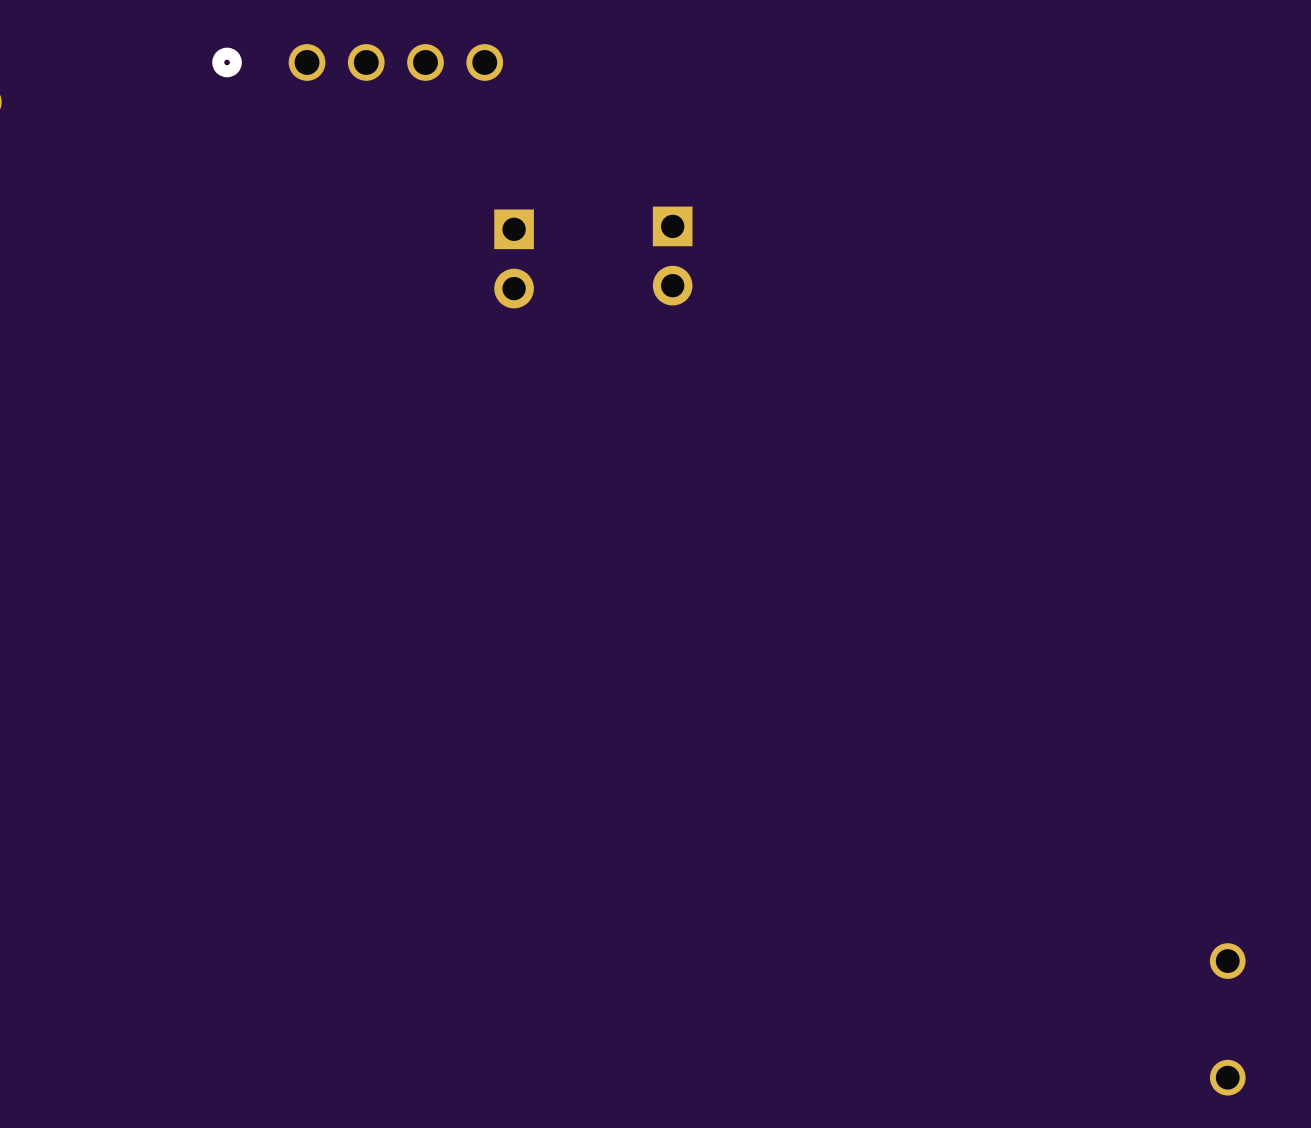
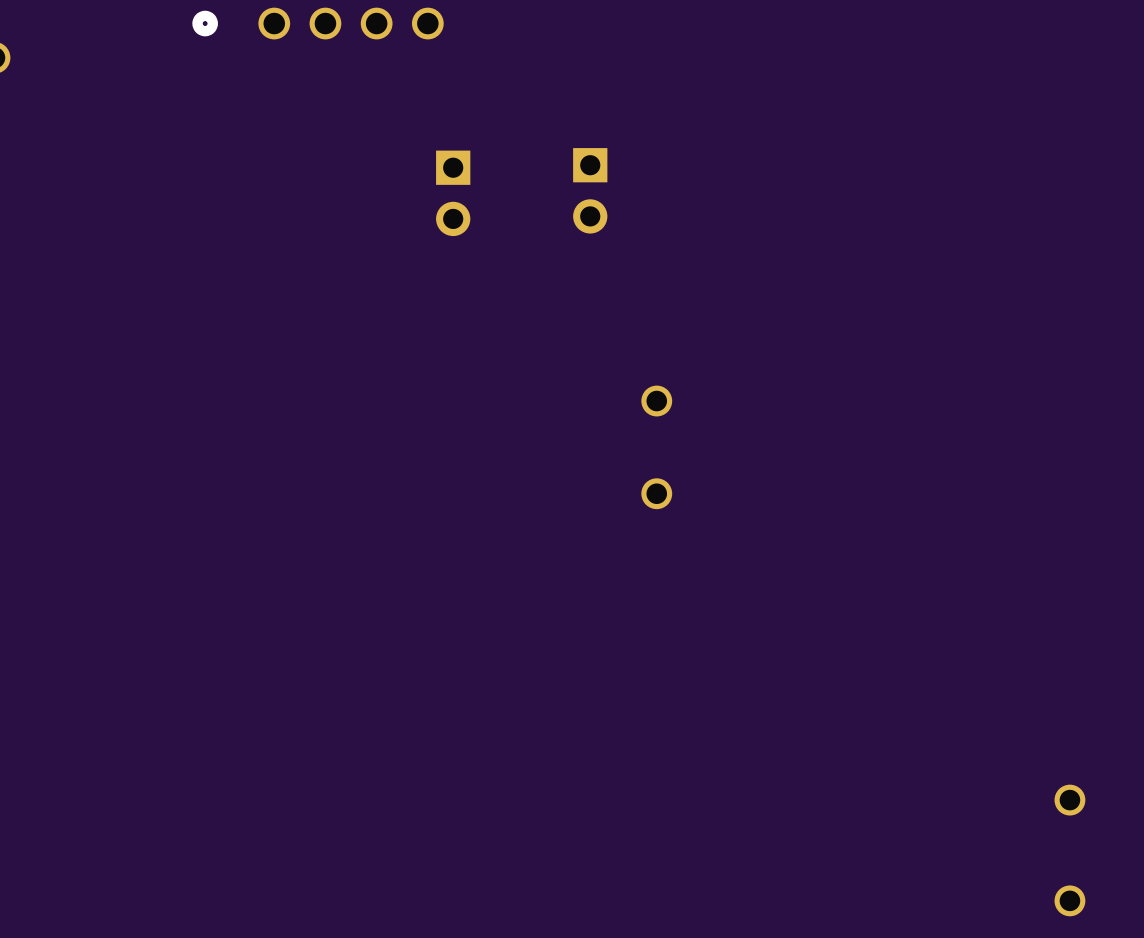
part: none -> (656, 401)
part: none -> (656, 493)

